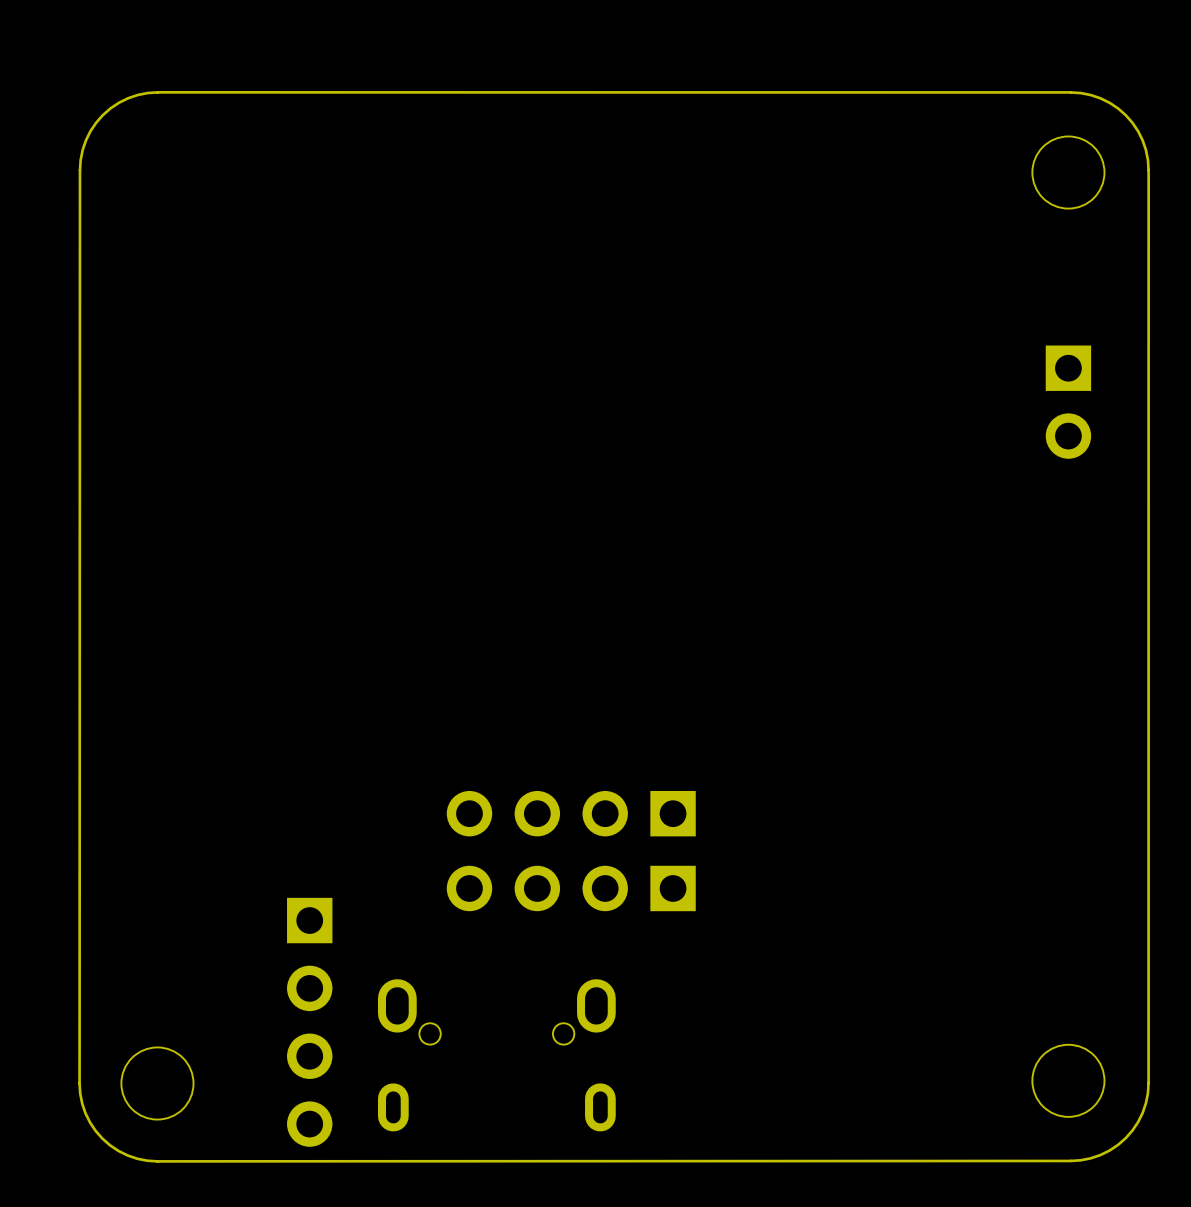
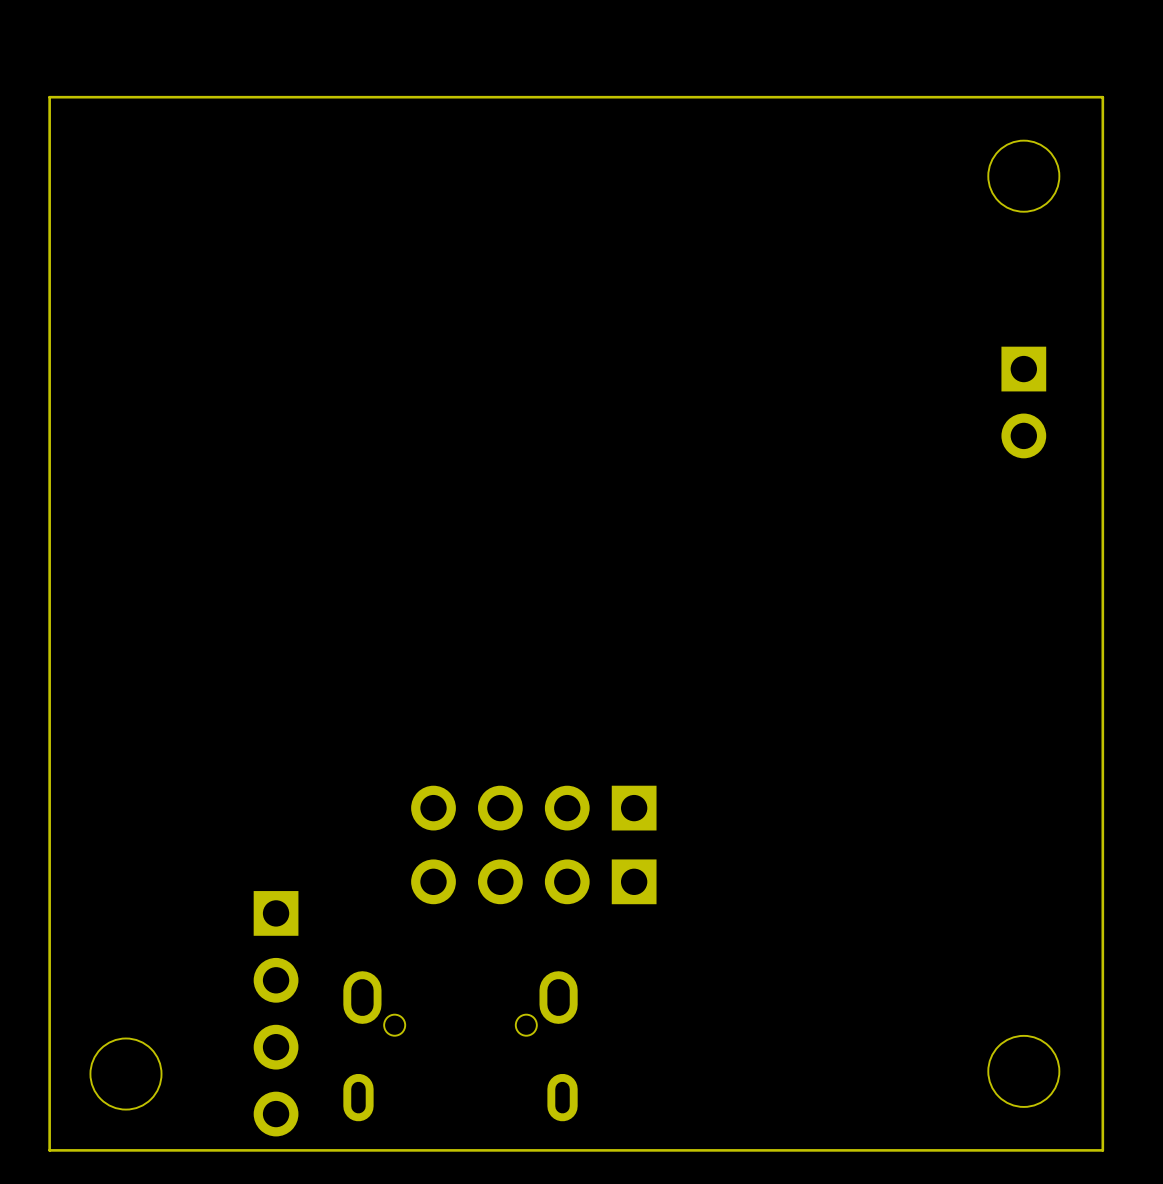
board edge: (1070, 92) (157, 92) (128, 98) (102, 115) (85, 140) (79, 170) (79, 1083) (85, 1113) (102, 1138) (127, 1155) (157, 1161) (1070, 1160) (1100, 1155) (1125, 1138) (1142, 1112) (1148, 1083) (1148, 170) (1142, 140) (1125, 115) (1100, 98) (1070, 92) -> (1102, 97) (1102, 1150) (49, 1150) (49, 97) (1102, 97)

